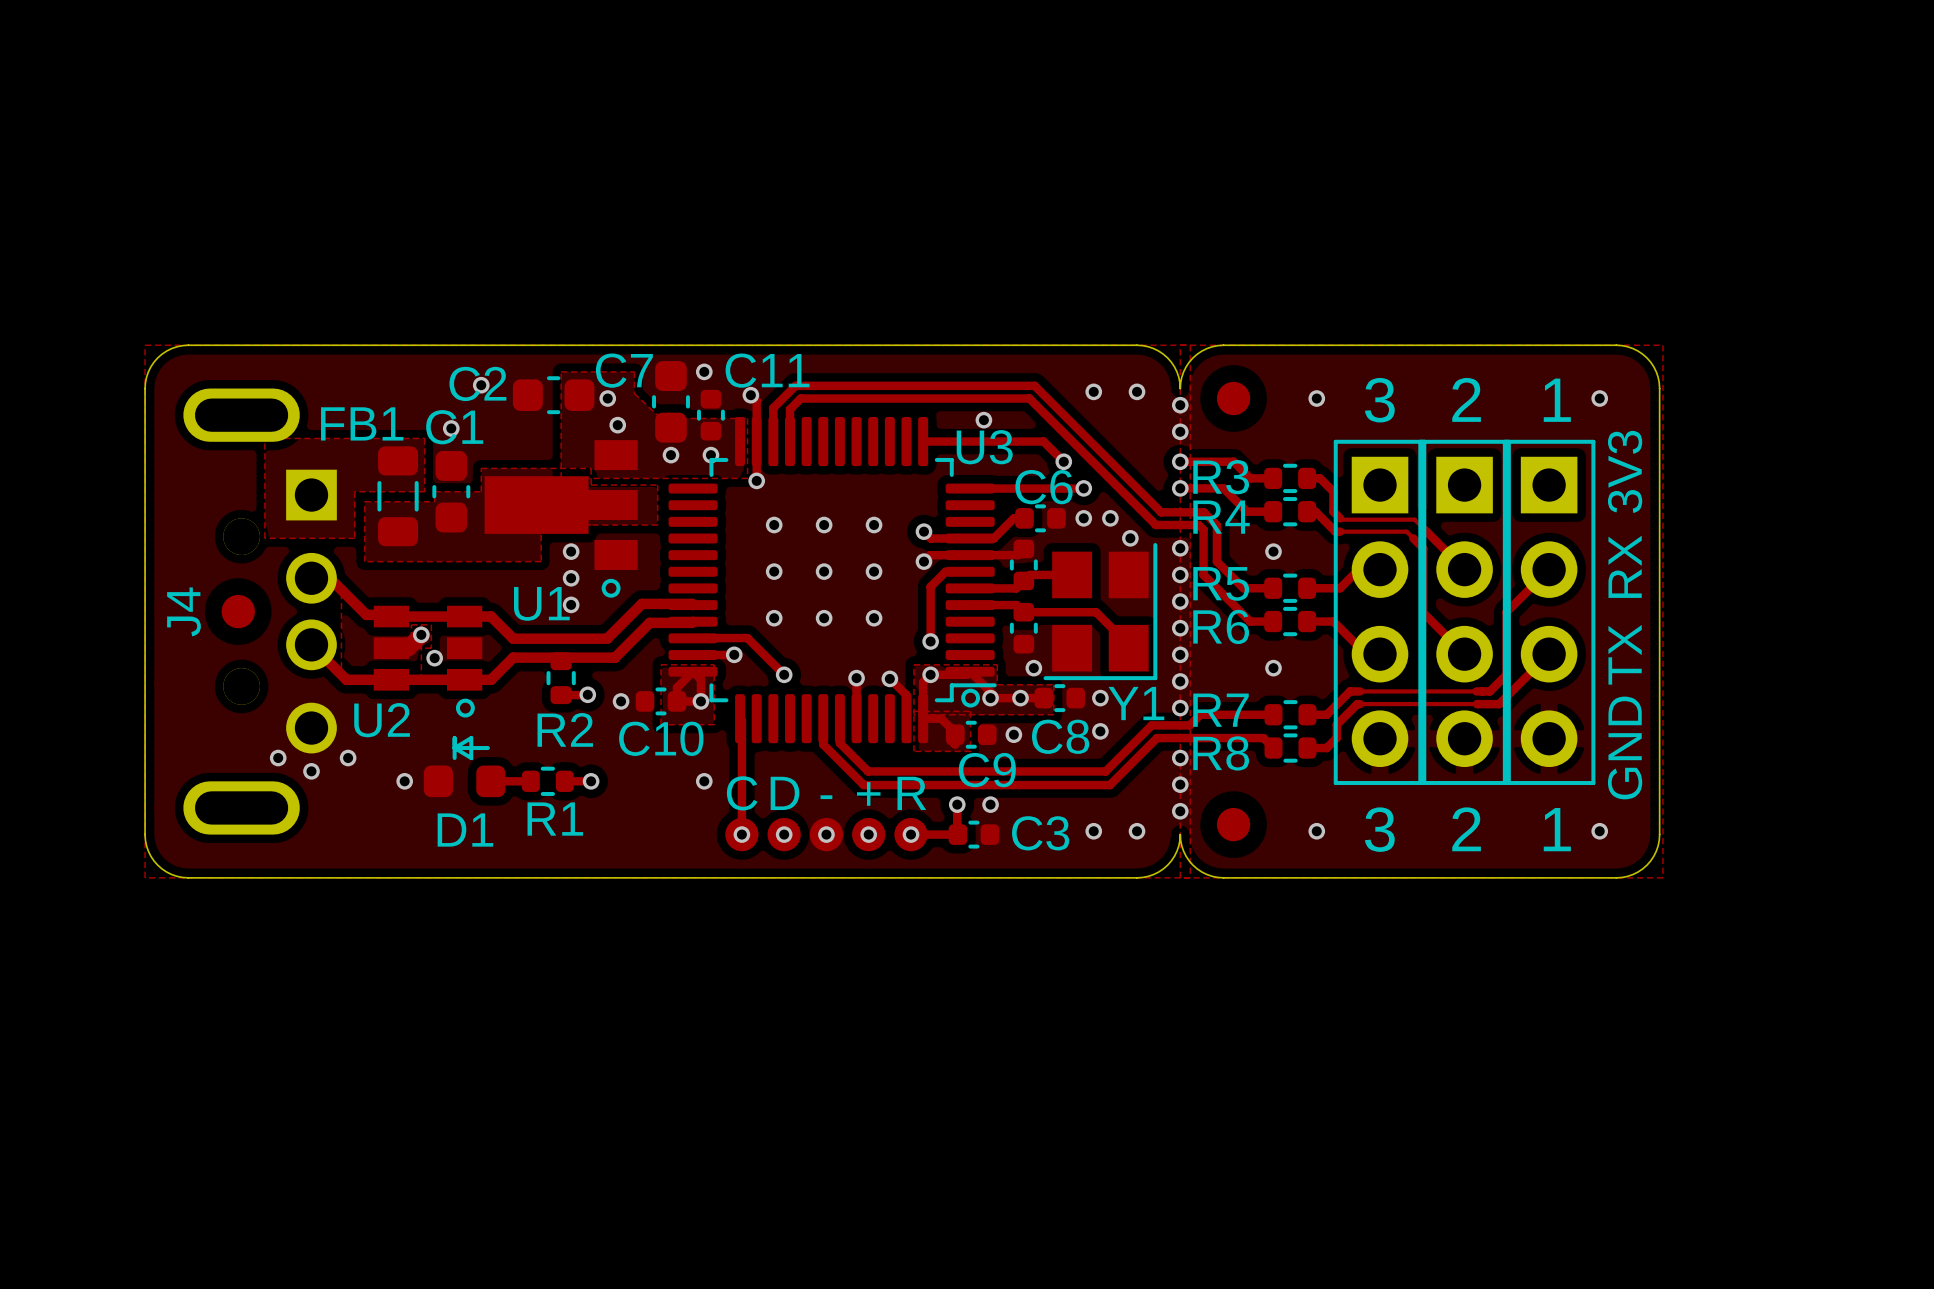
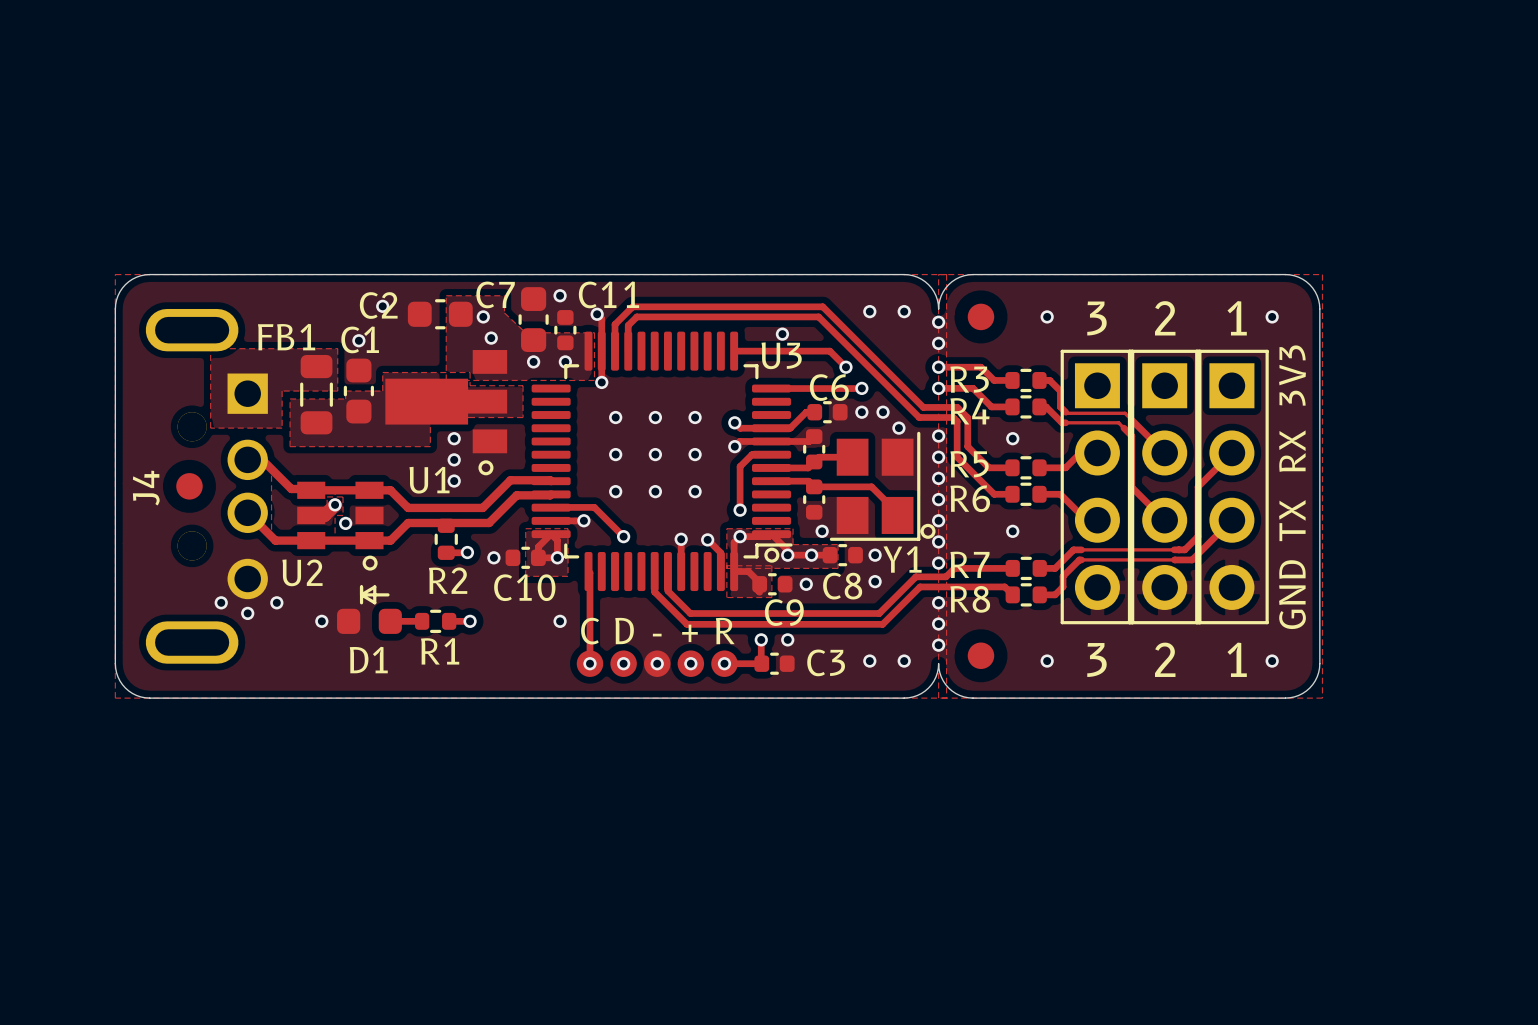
drawing: none -> [920, 523, 936, 539]

